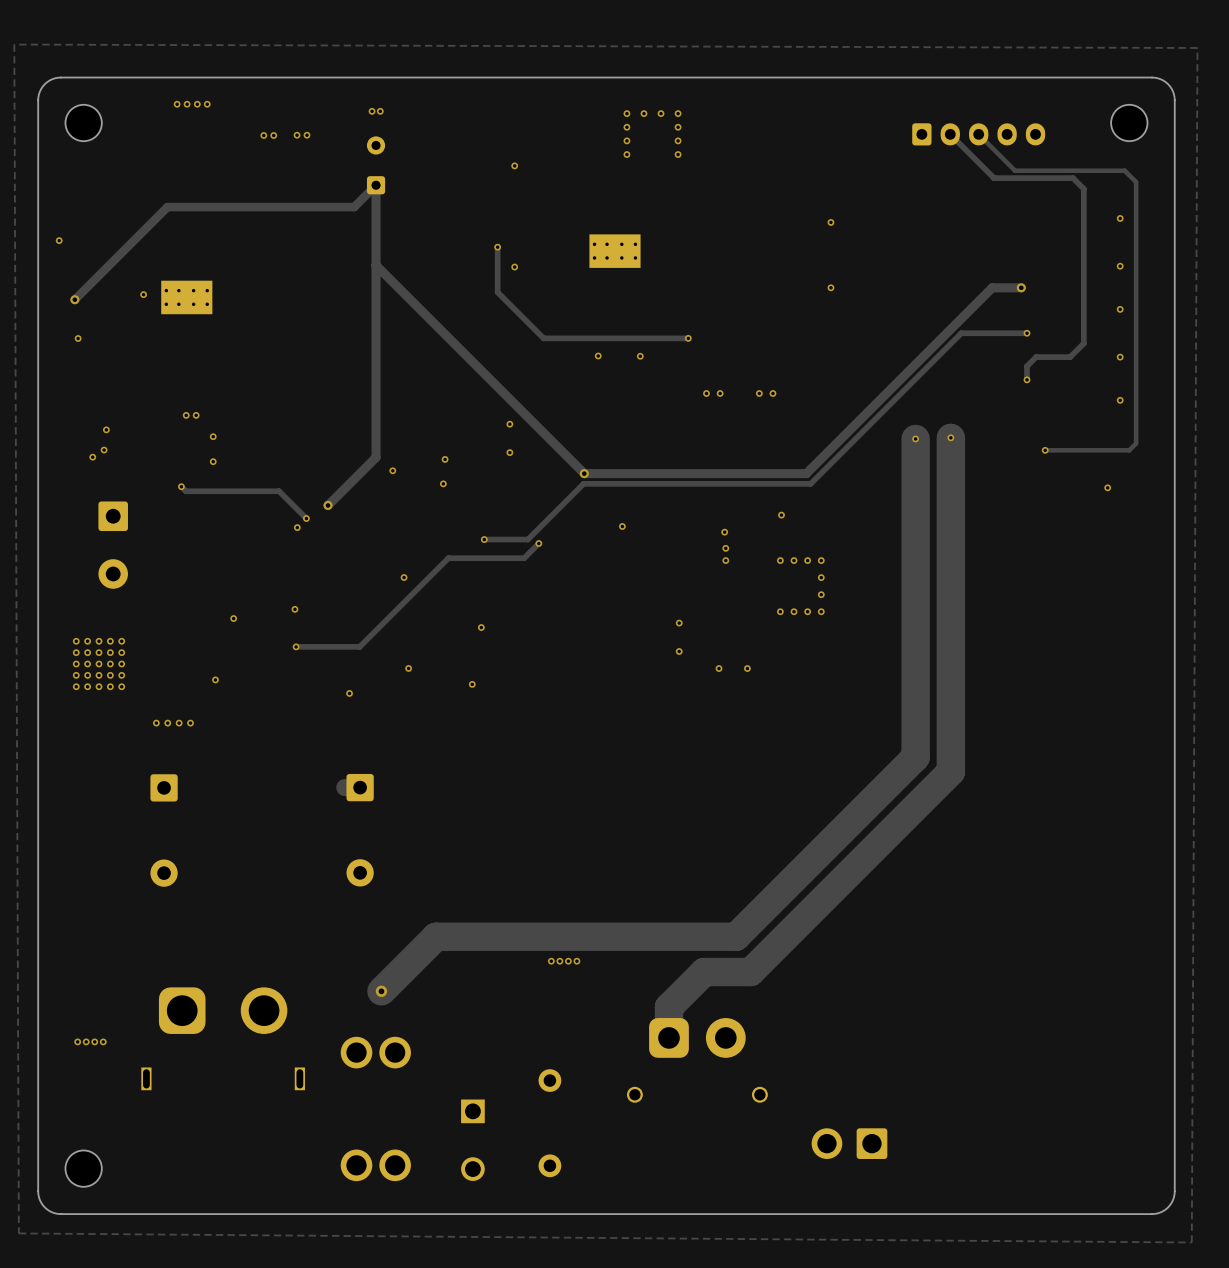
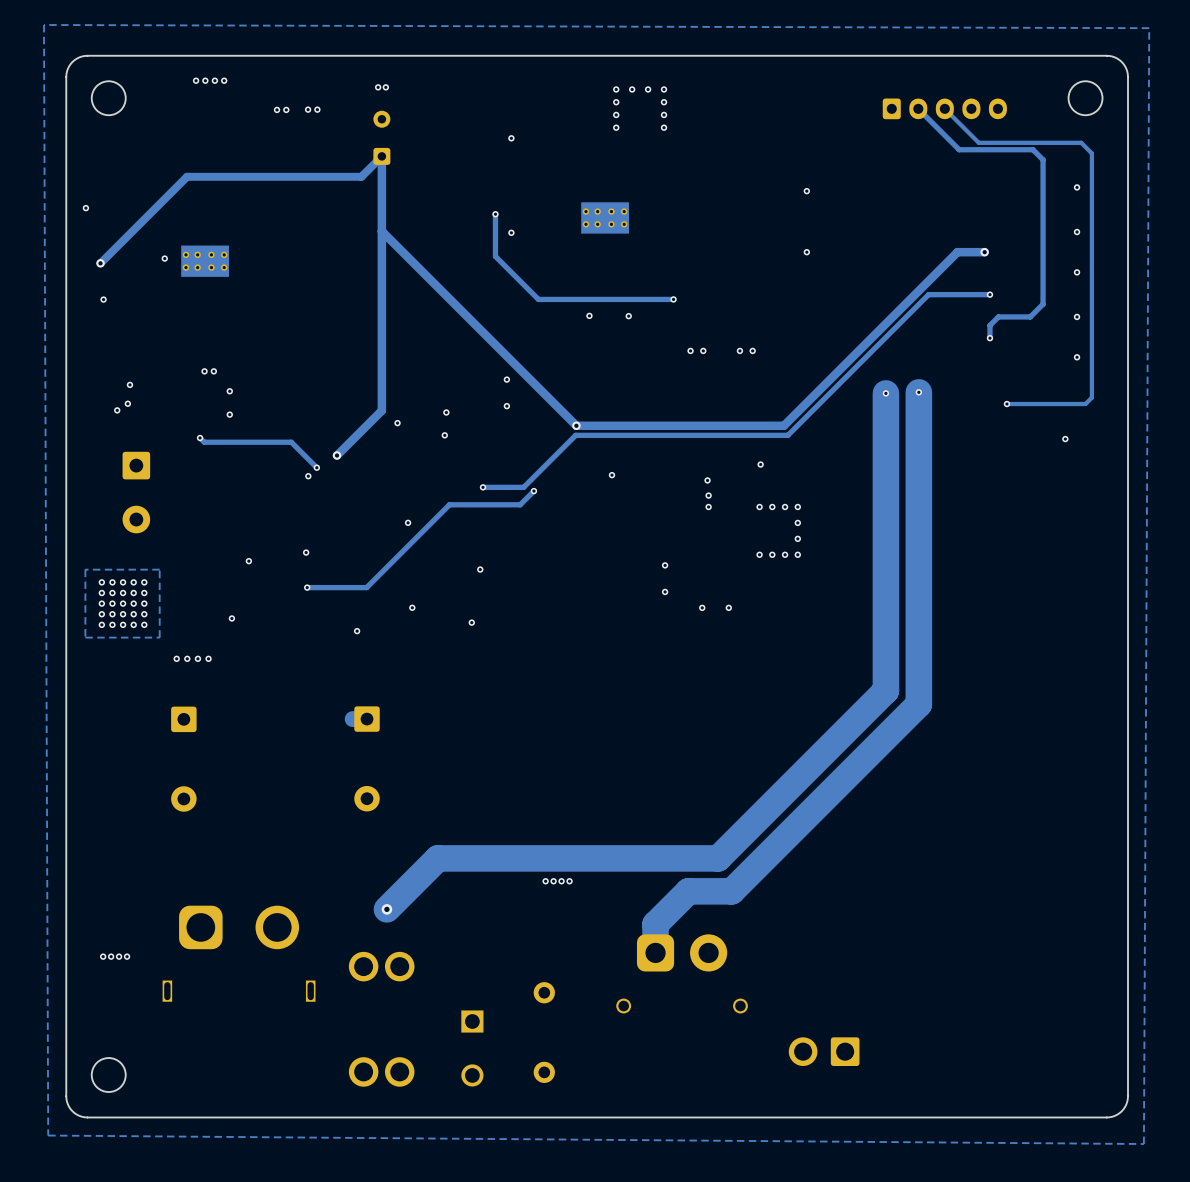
zone outline: none -> (159, 569) (85, 569) (85, 637) (159, 637) (159, 569)

